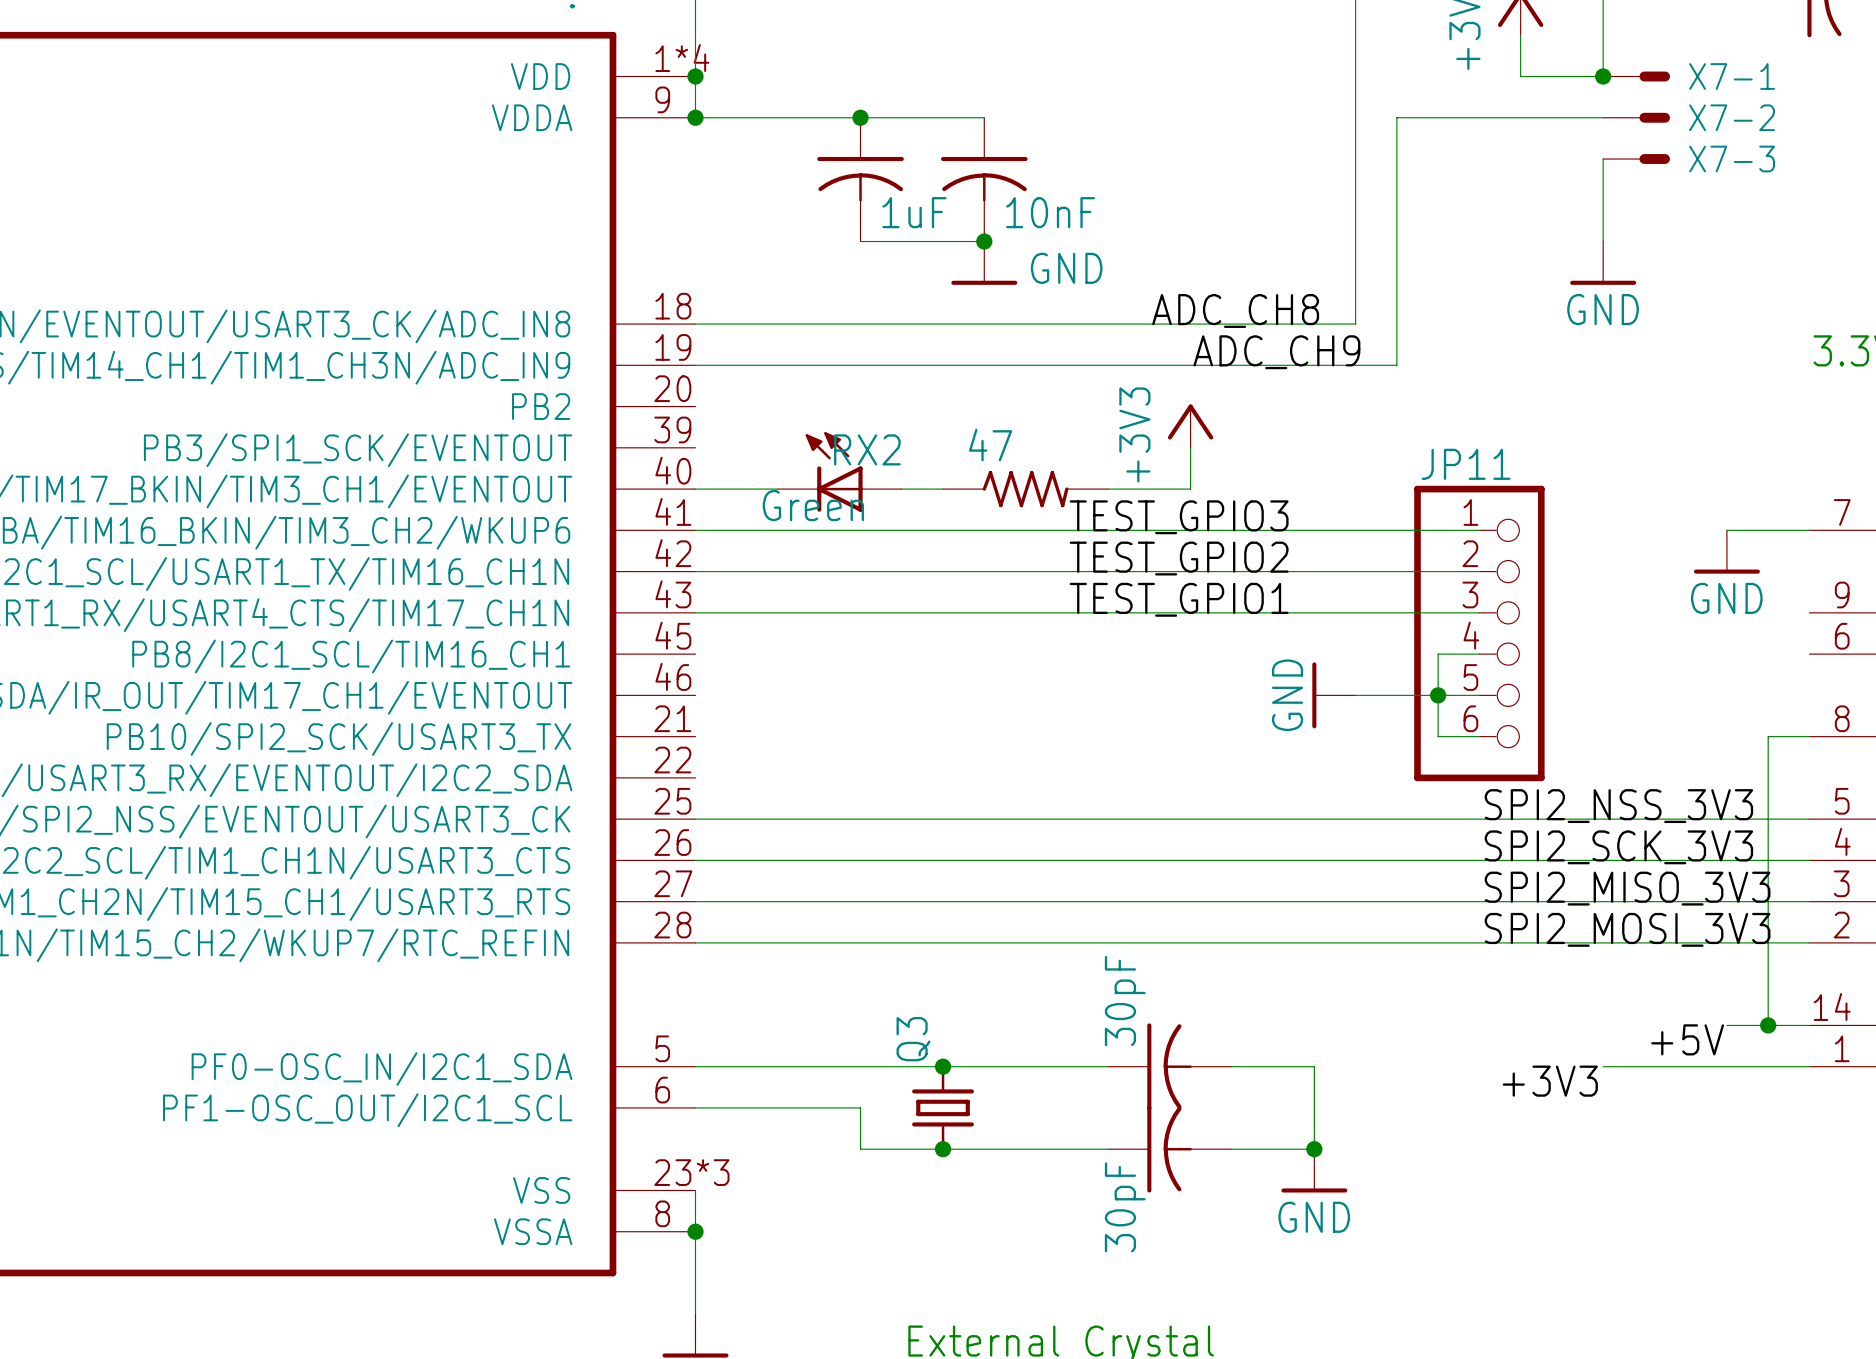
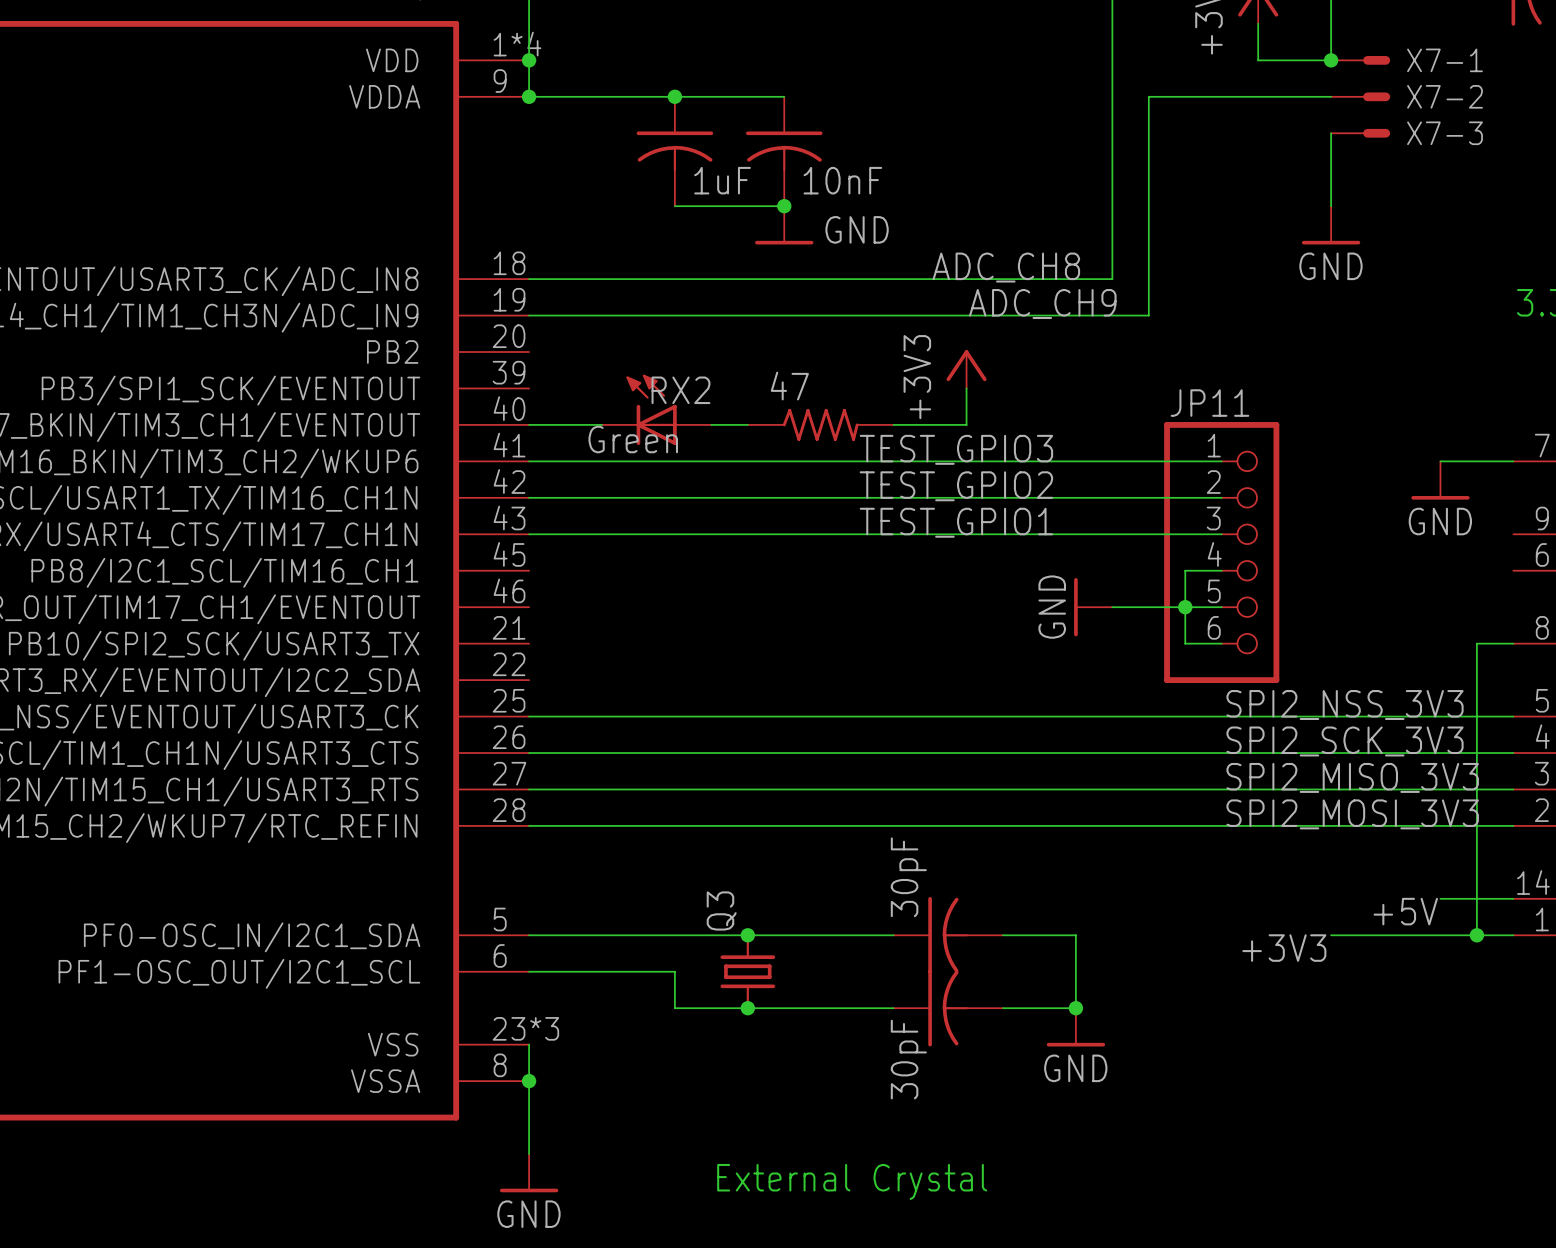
wire: none -> (1476, 898) (1476, 935)
junction position: (1768, 1025) -> (1476, 935)

